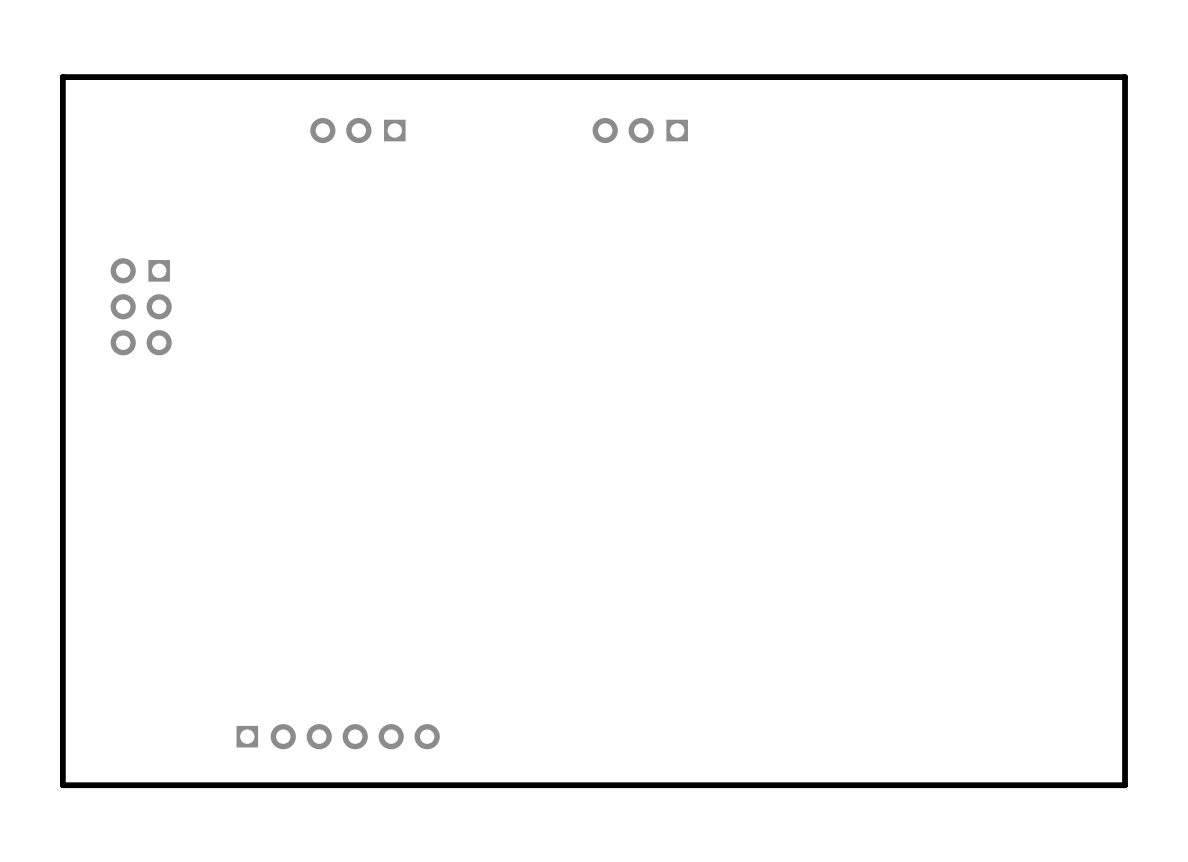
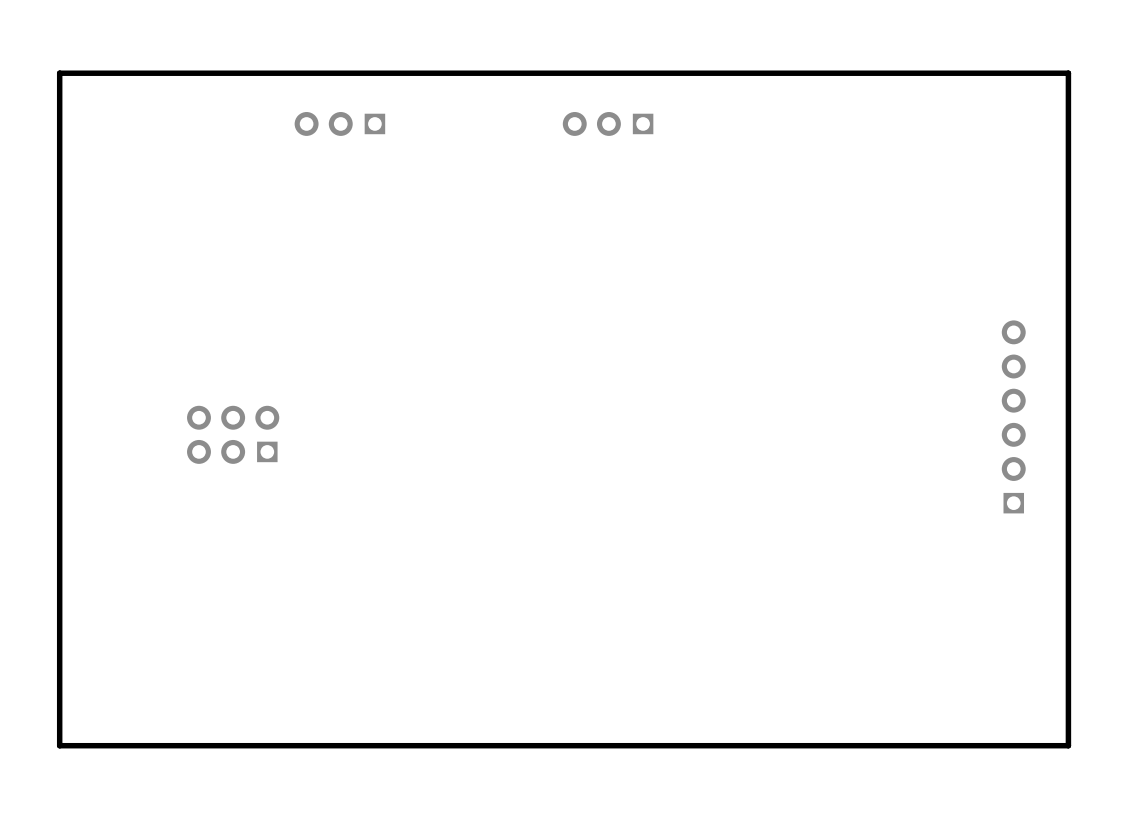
part rotation: 0° (141, 306) -> 90° clockwise (233, 434)
part position: (141, 306) -> (233, 434)
part: none -> (1013, 416)
part: (338, 736) -> none

